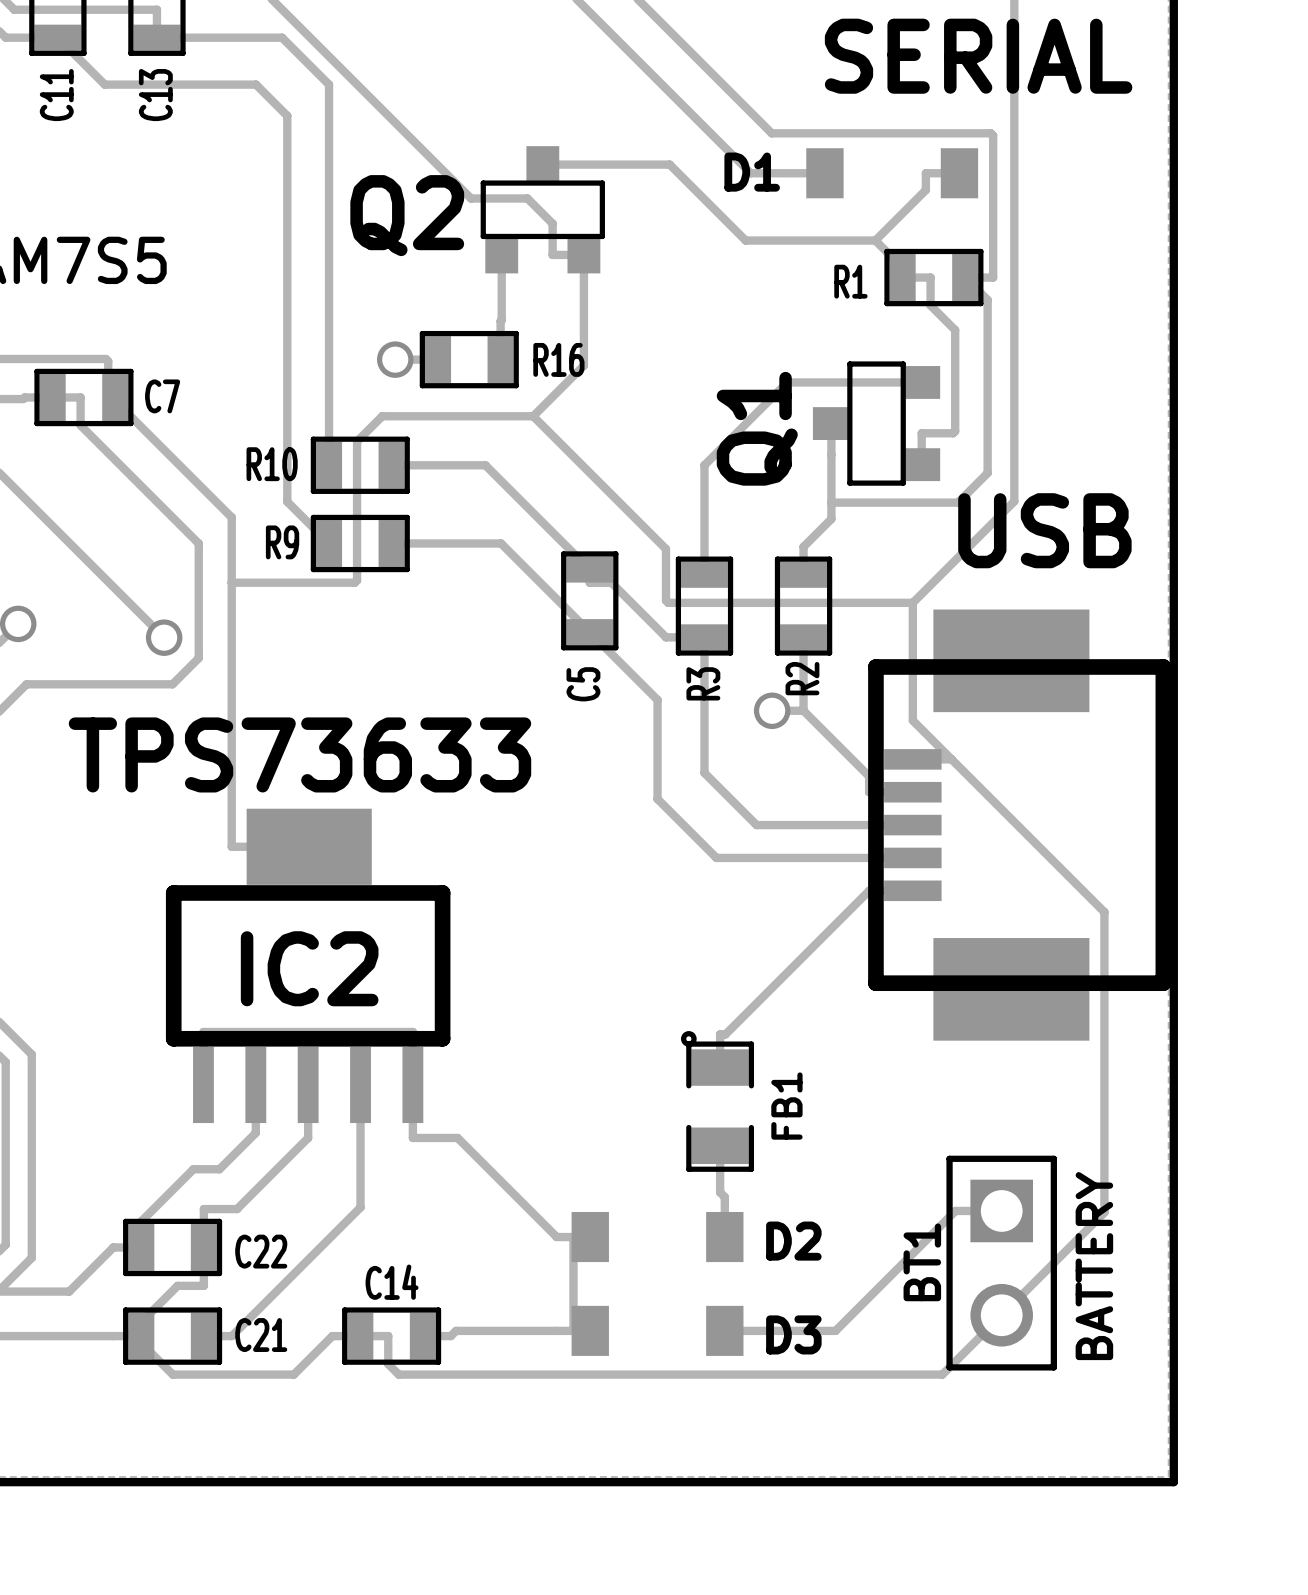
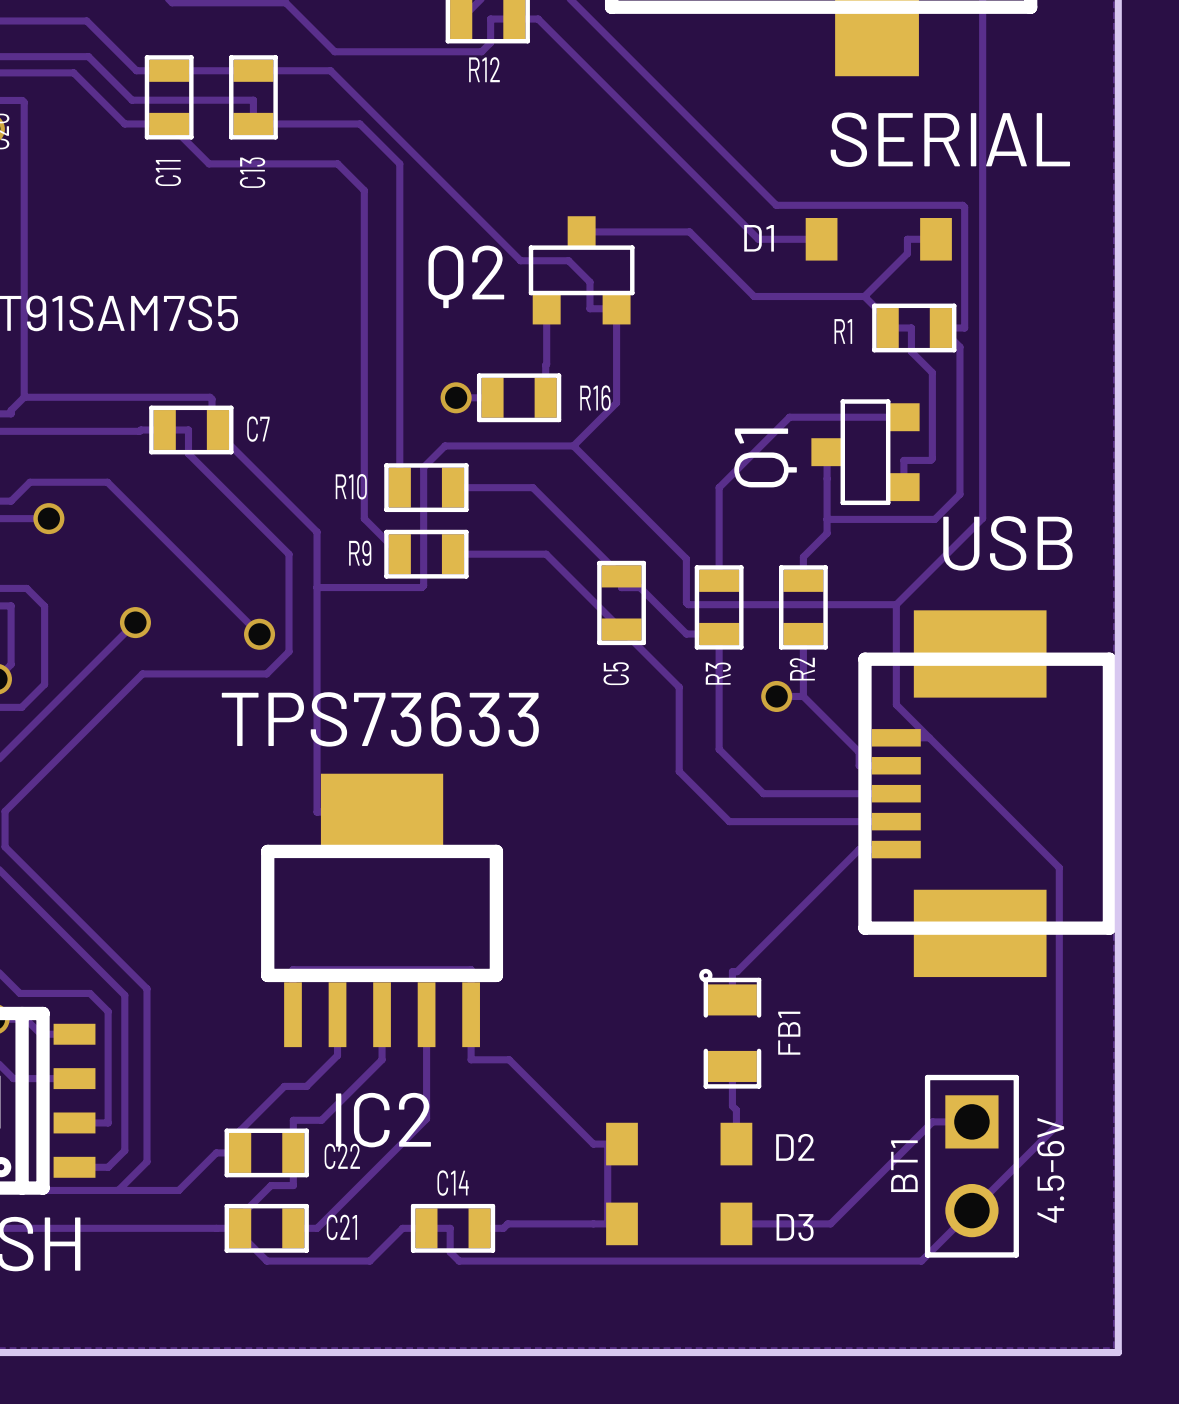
IC2 value position: TPS73633 (299, 754) -> TPS73633 (380, 719)
IC2 footprint: [165, 808, 451, 1124] -> [261, 773, 504, 1048]
IC2 name position: IC2 (309, 968) -> IC2 (383, 1120)
BT1 value: BATTERY (1094, 1266) -> 4.5-6V (1050, 1170)

